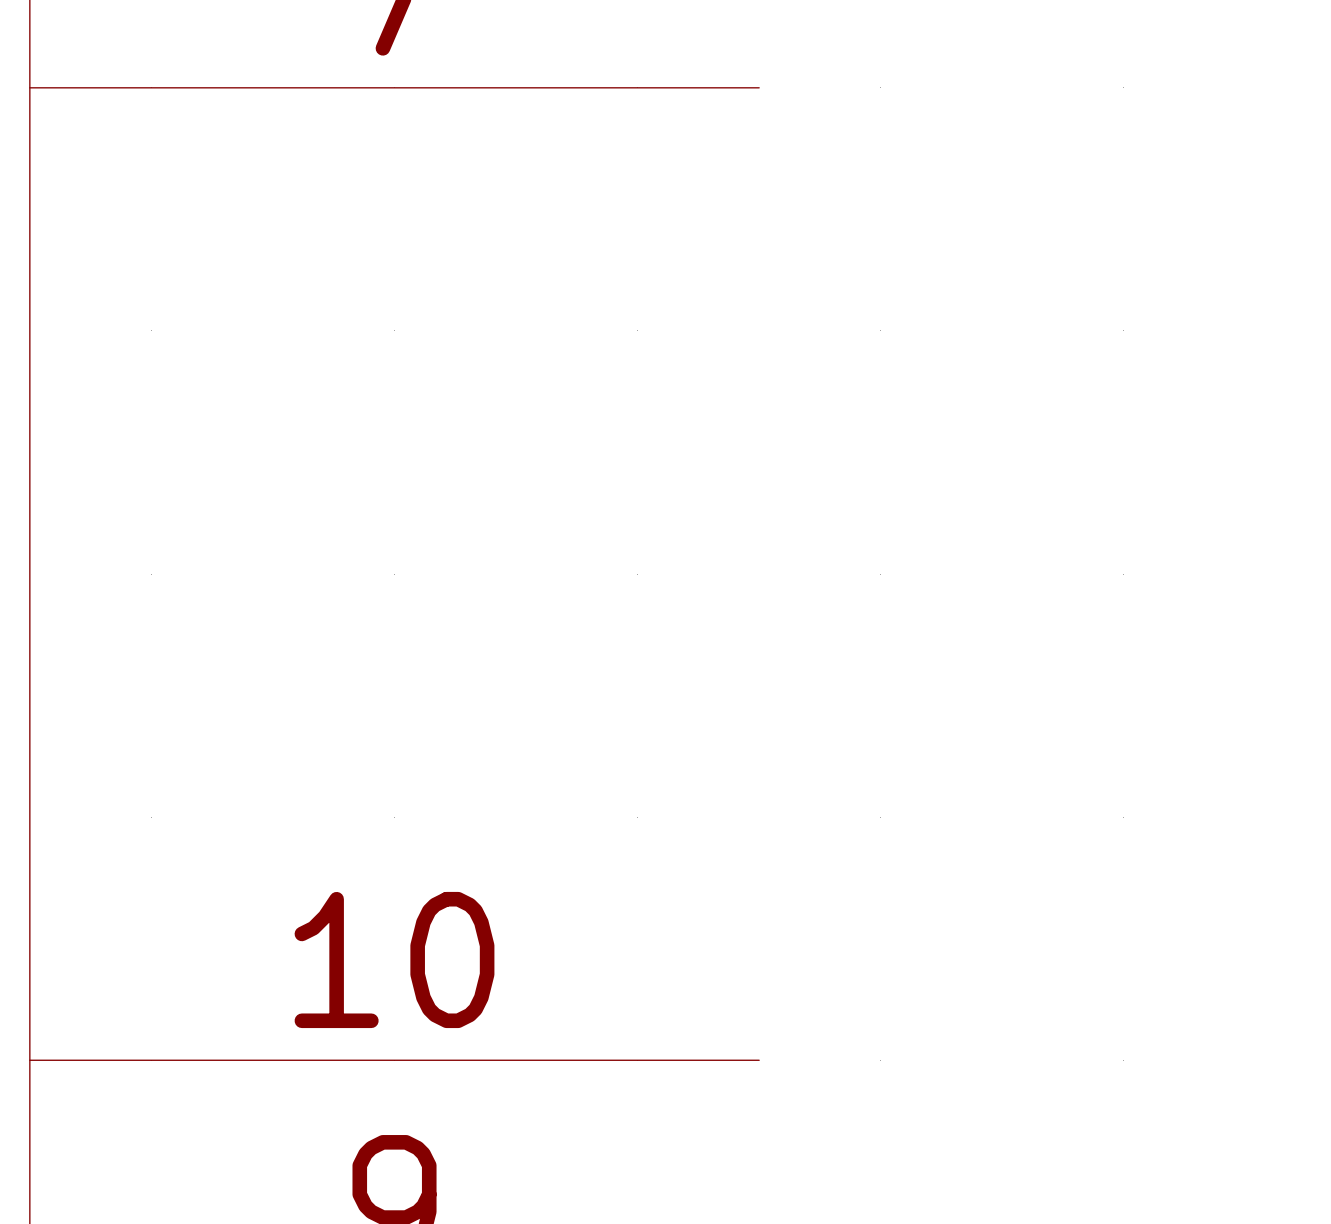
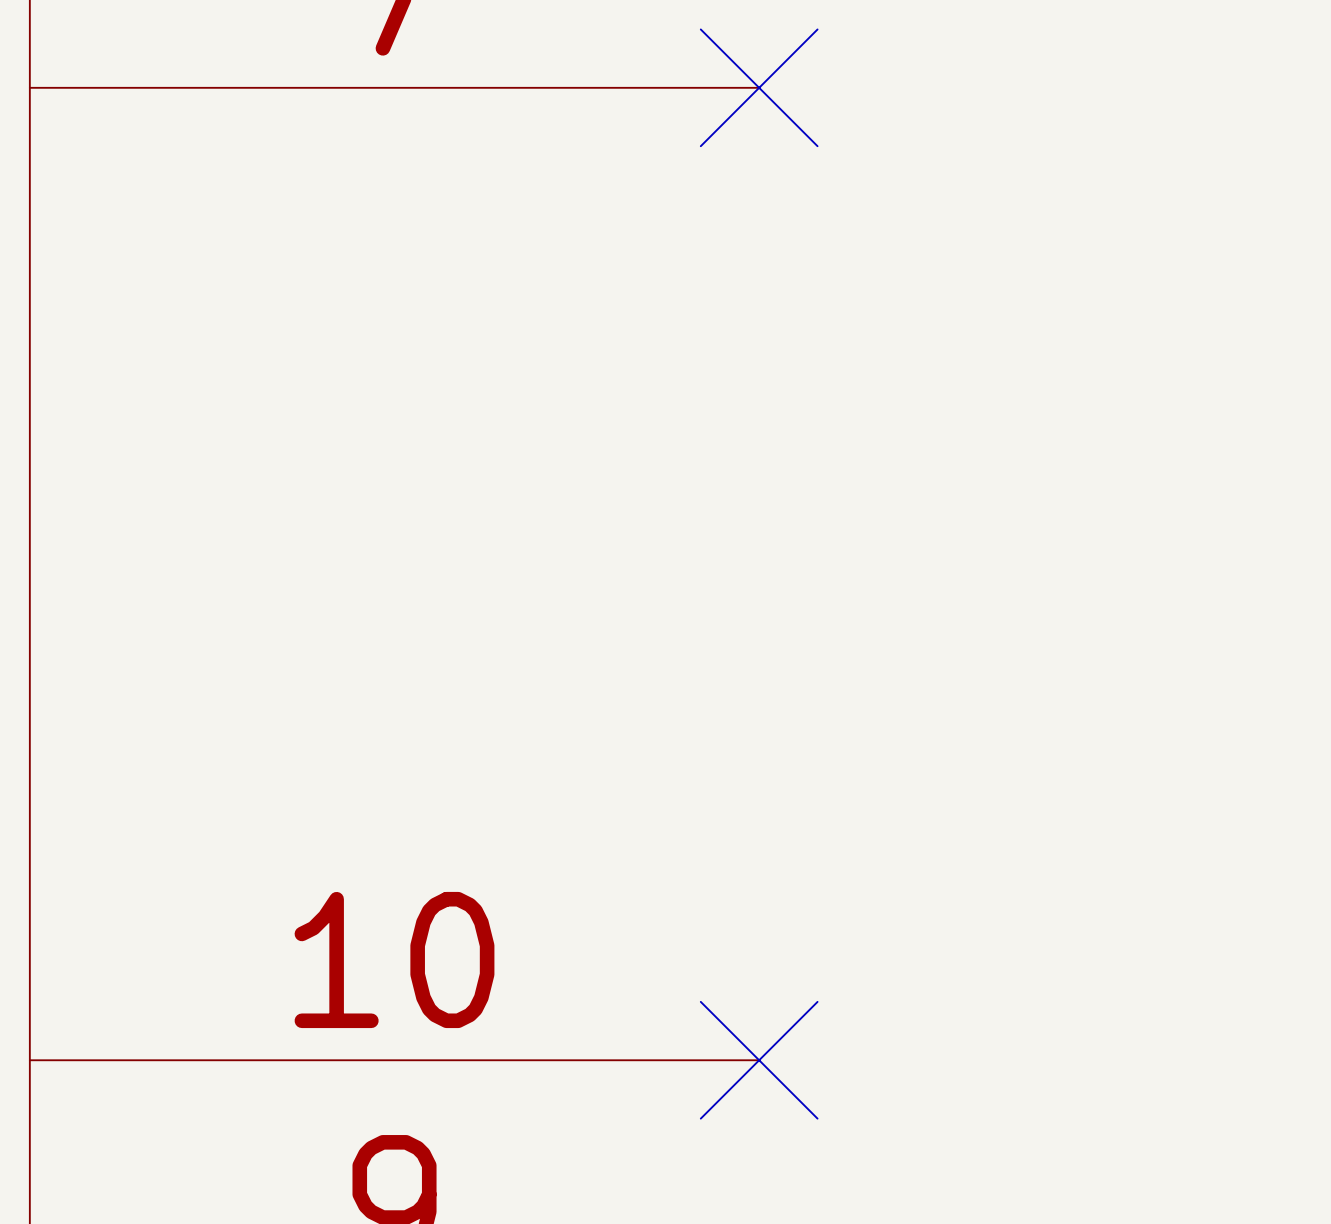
no-connect mark: none -> (759, 87)
no-connect mark: none -> (759, 1060)

